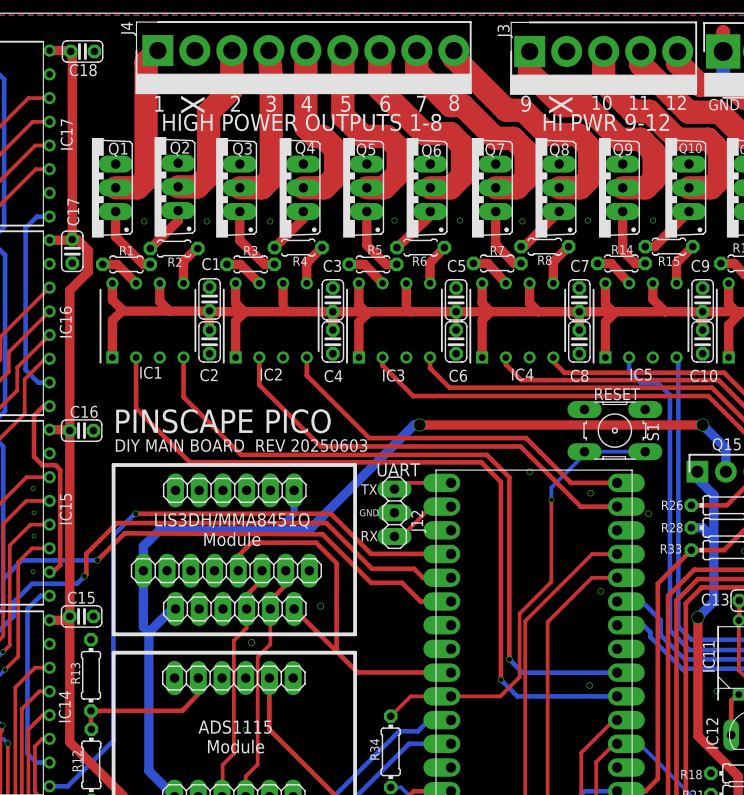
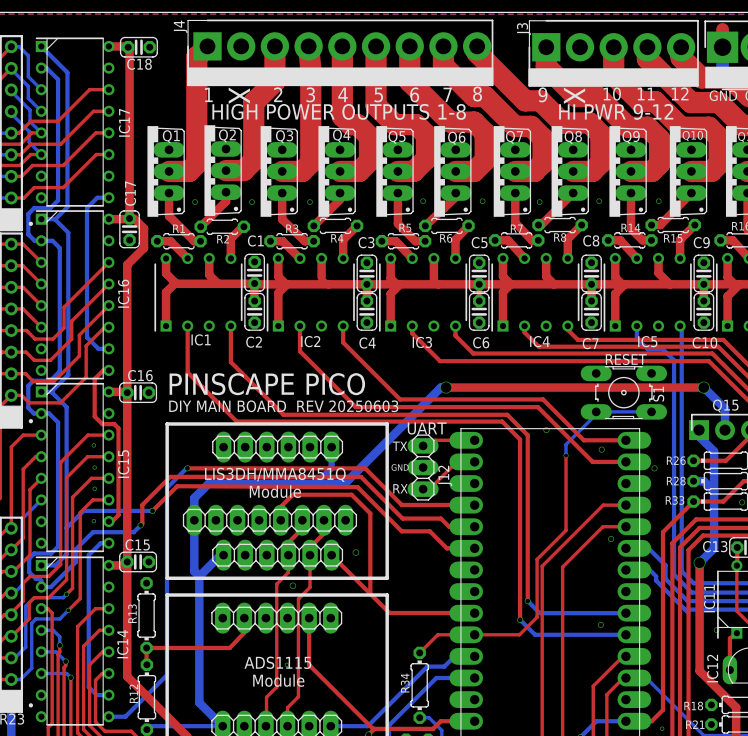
C7 name: C7 (579, 265) -> C8 (591, 240)
C8 name: C8 (579, 375) -> C7 (590, 343)

